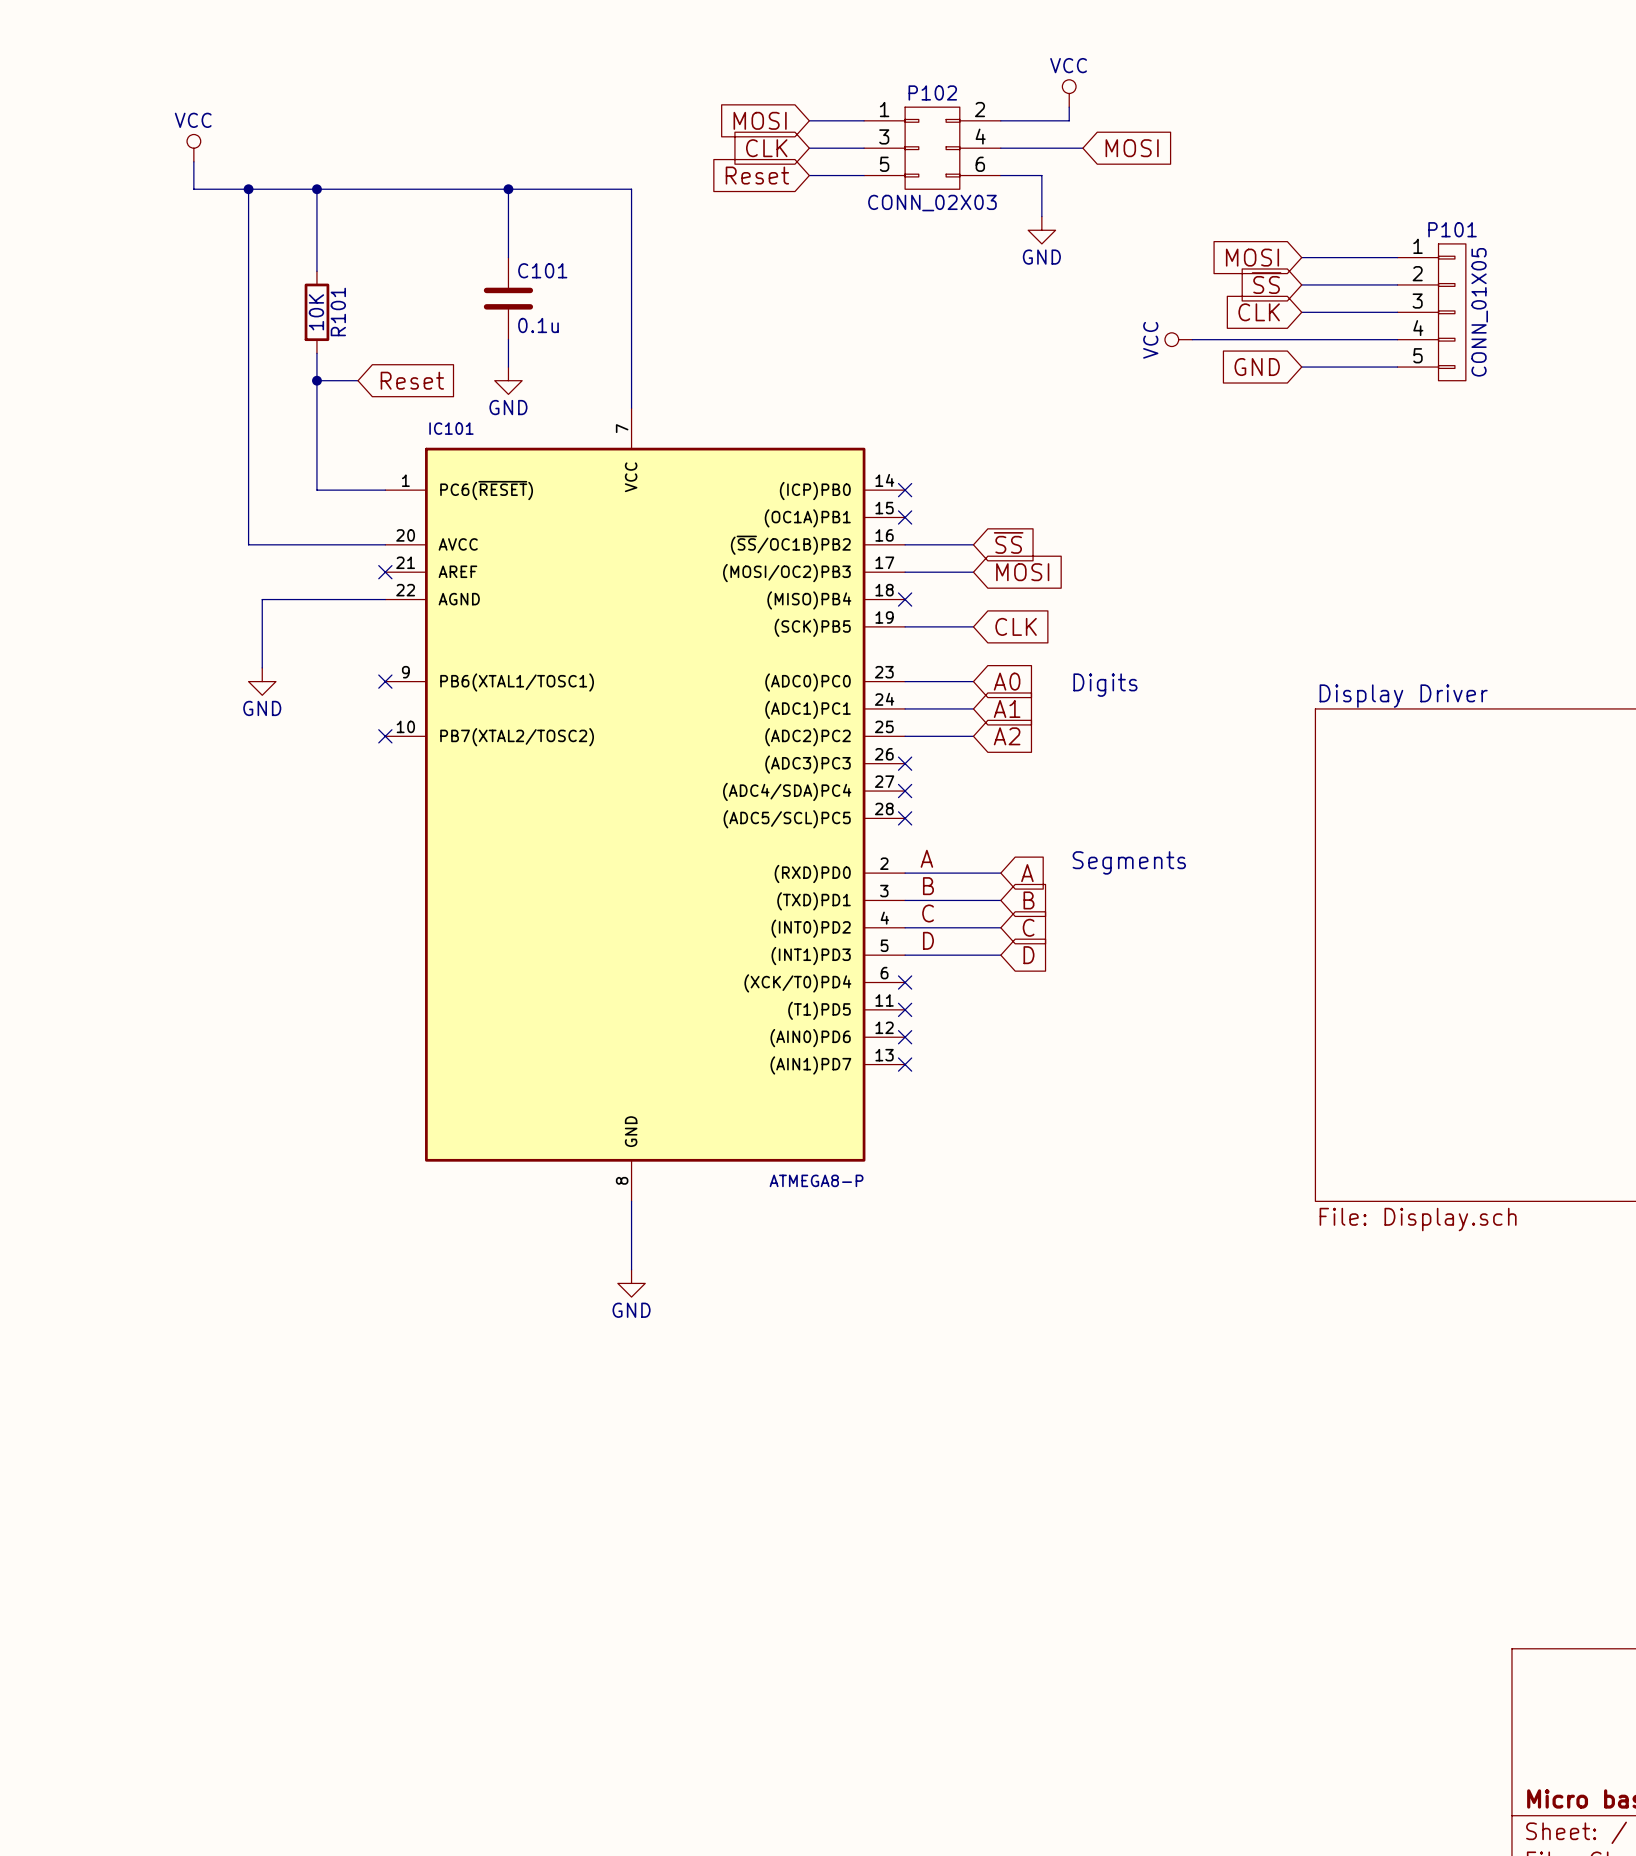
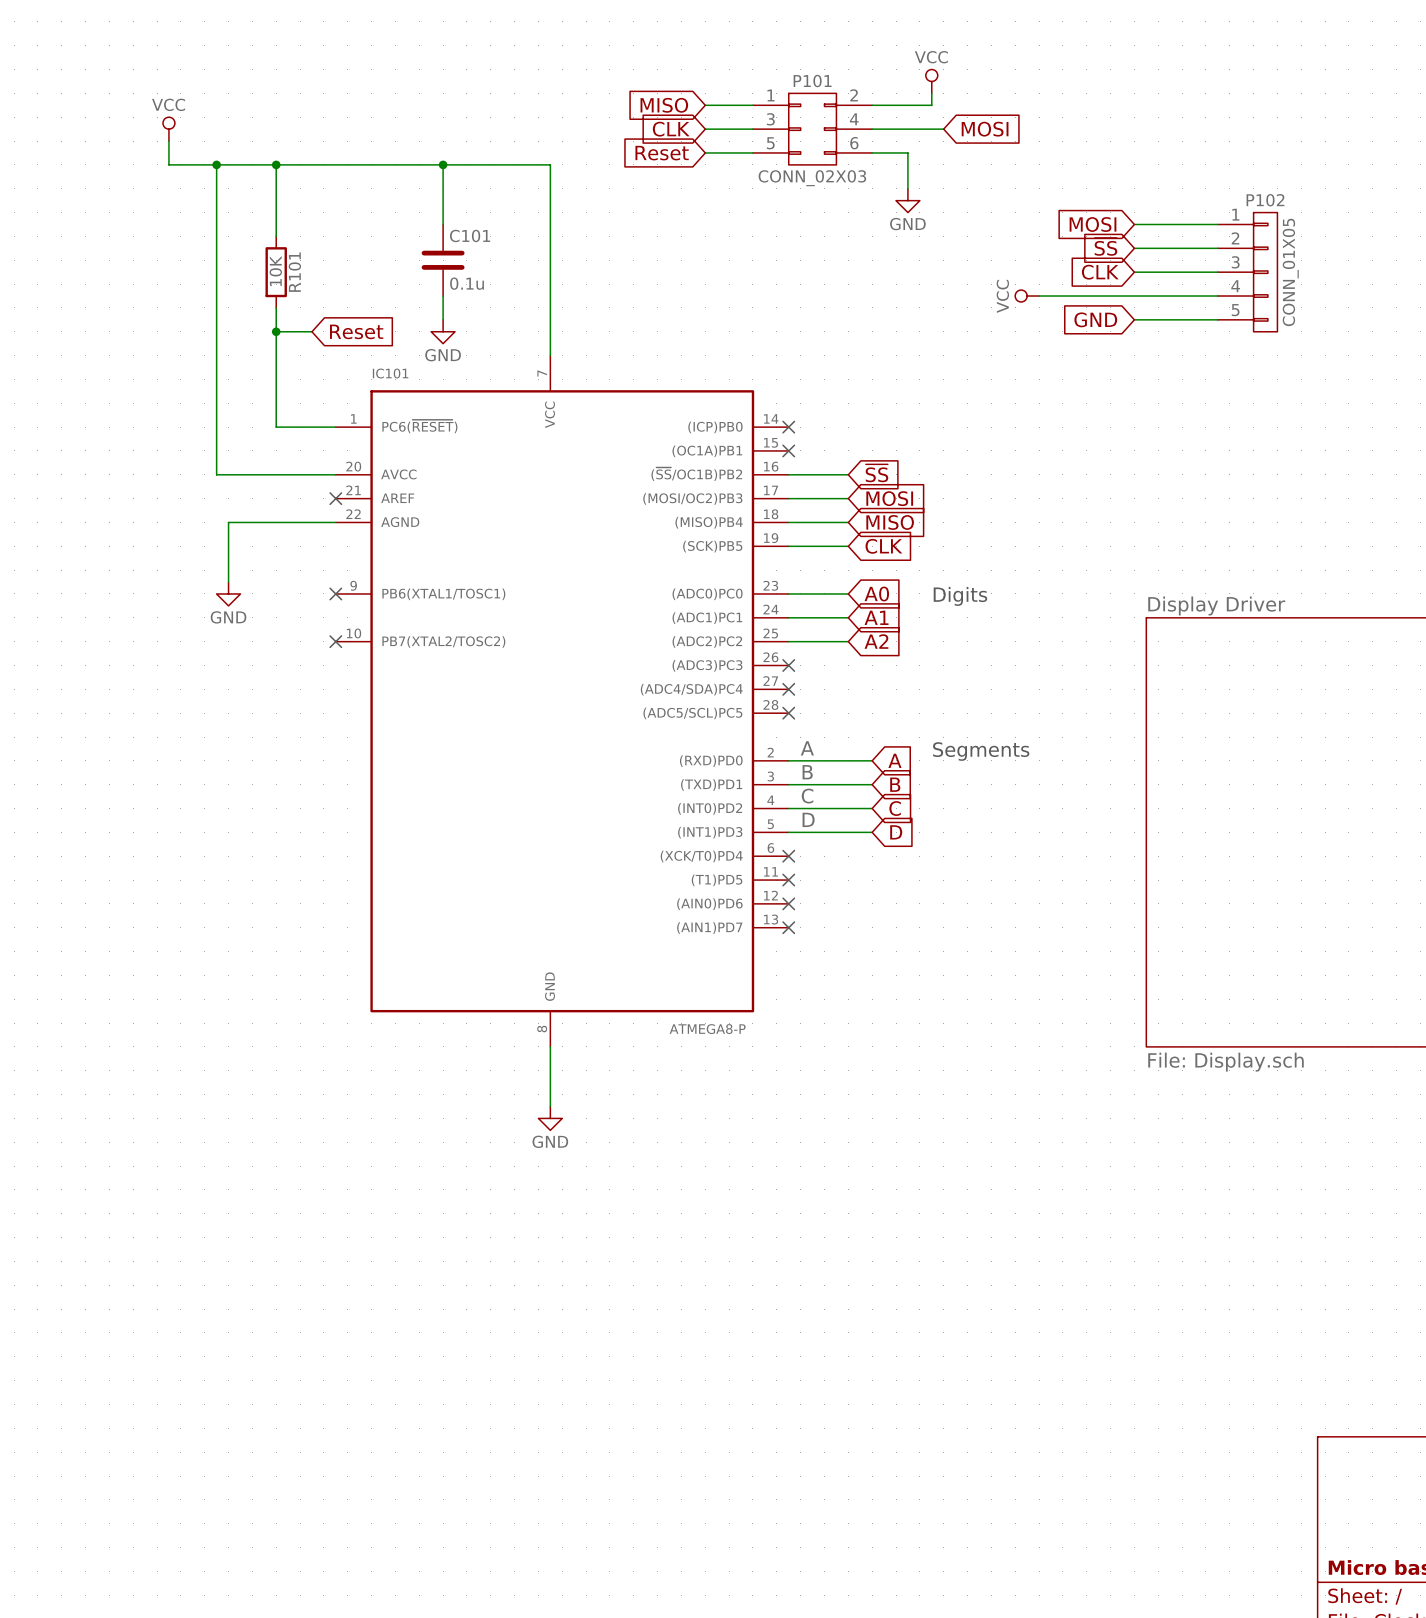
P102 name: P102 (932, 92) -> P101 (812, 81)
global label: MOSI (760, 120) -> MISO (664, 105)
P101 name: P101 (1452, 229) -> P102 (1265, 200)
wire: none -> (788, 522) (848, 522)
no-connect mark: (905, 599) -> none
global label: none -> MISO (890, 522)

